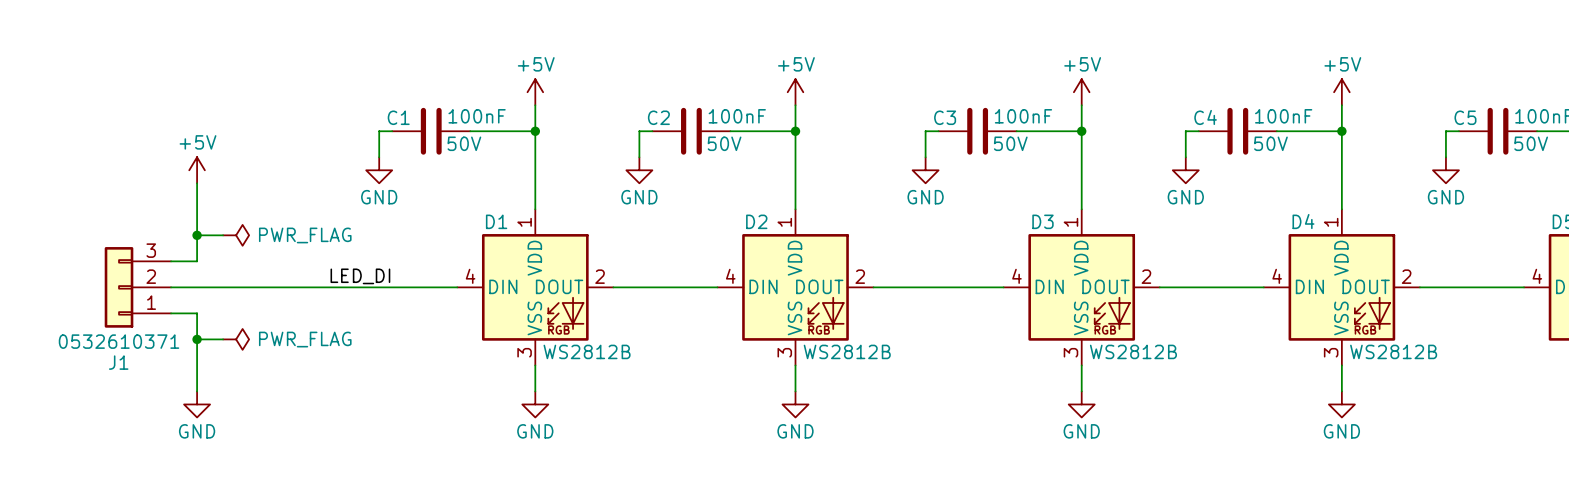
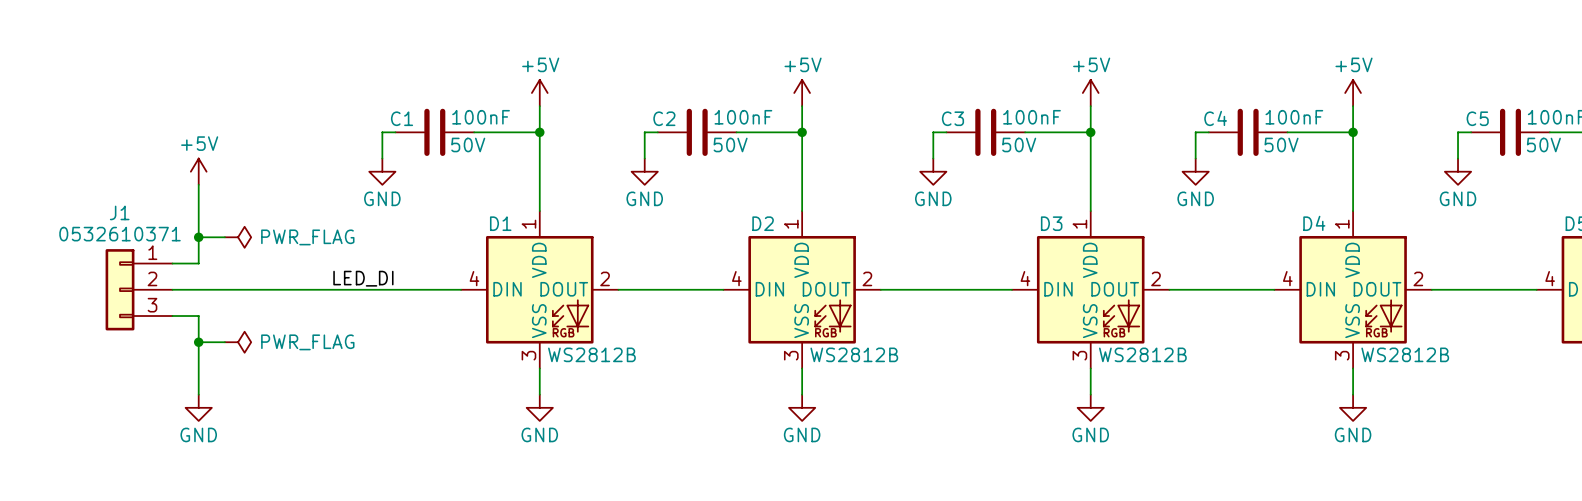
J1 flip: as is (119, 287) -> up-down (120, 289)

